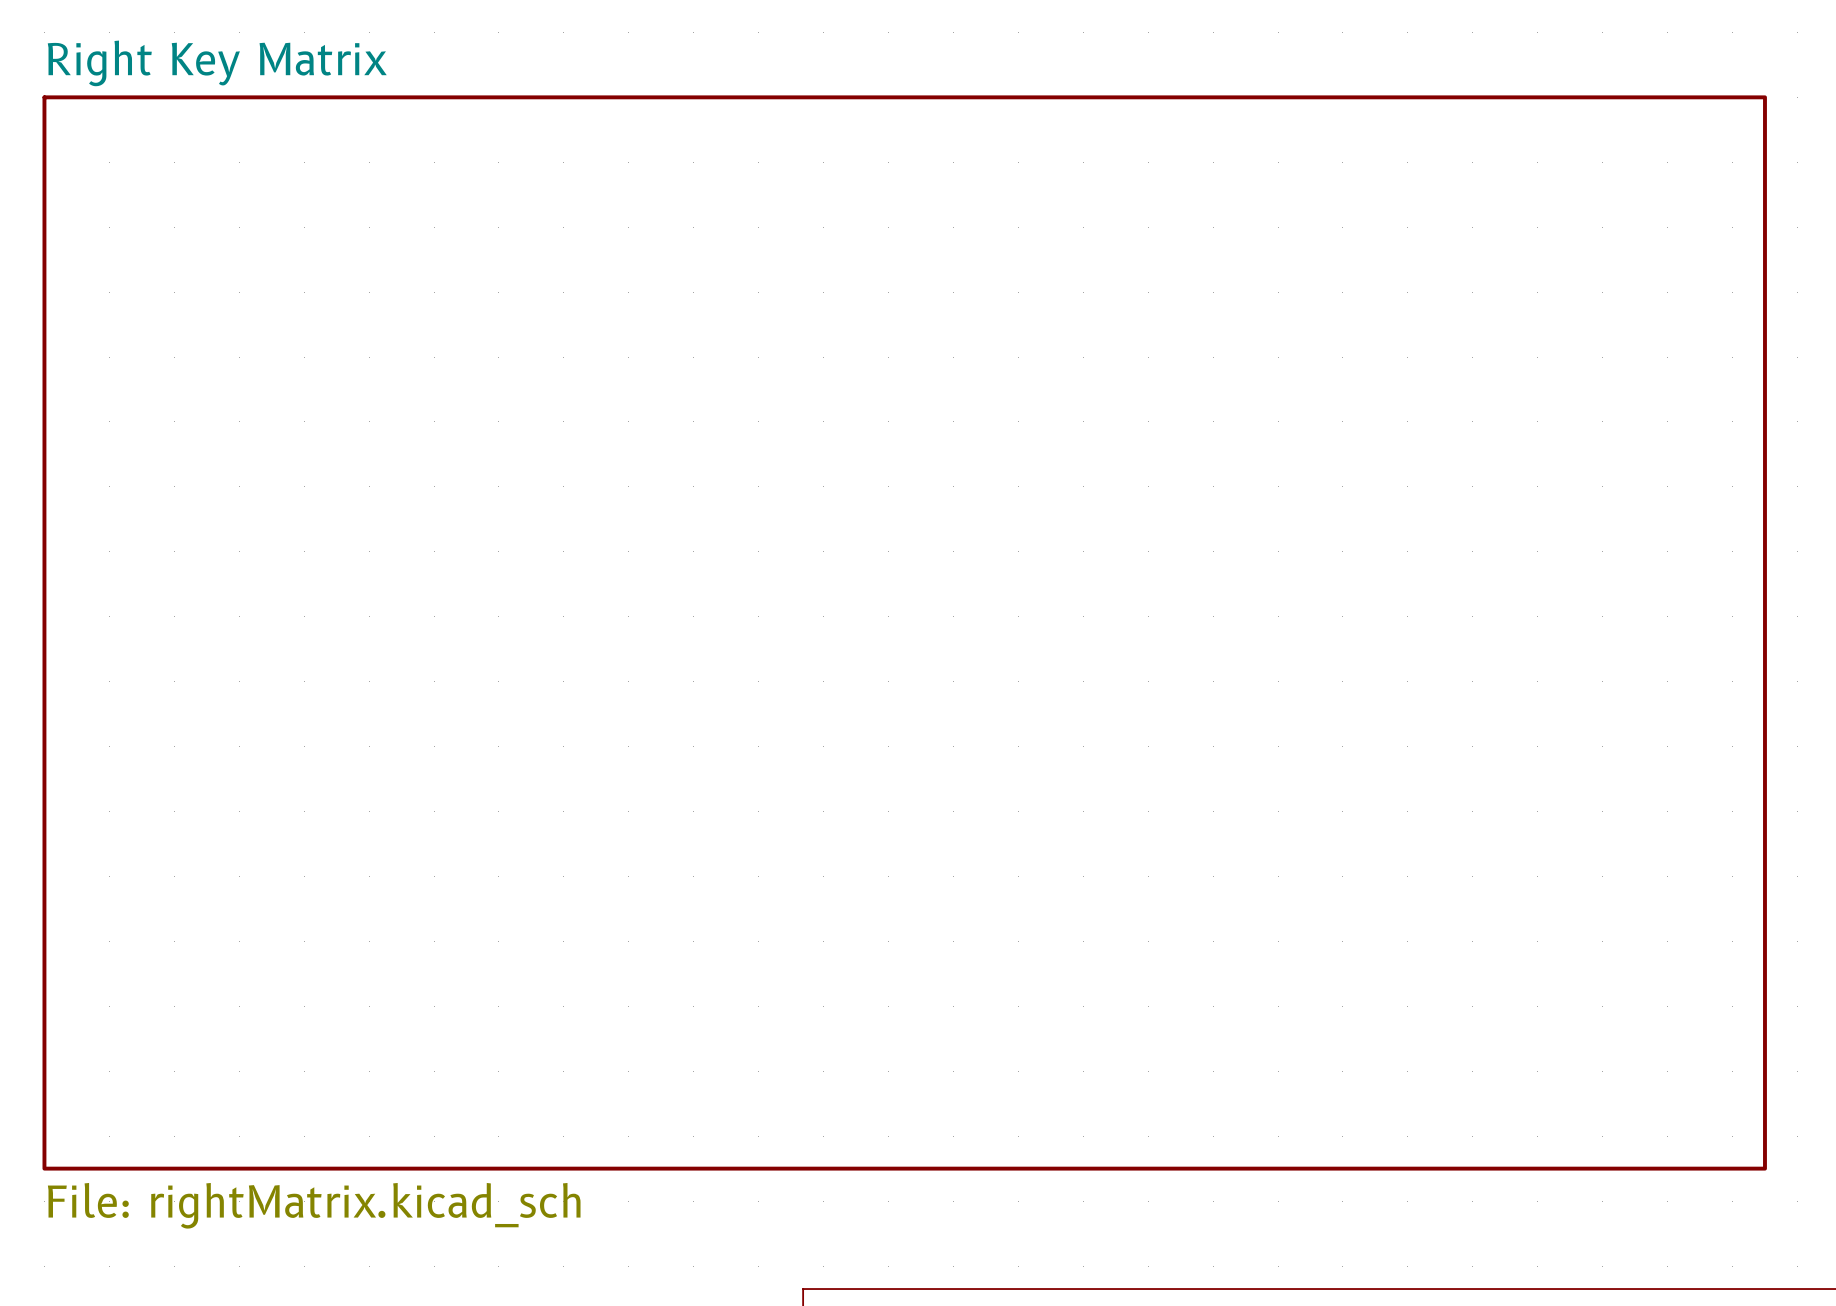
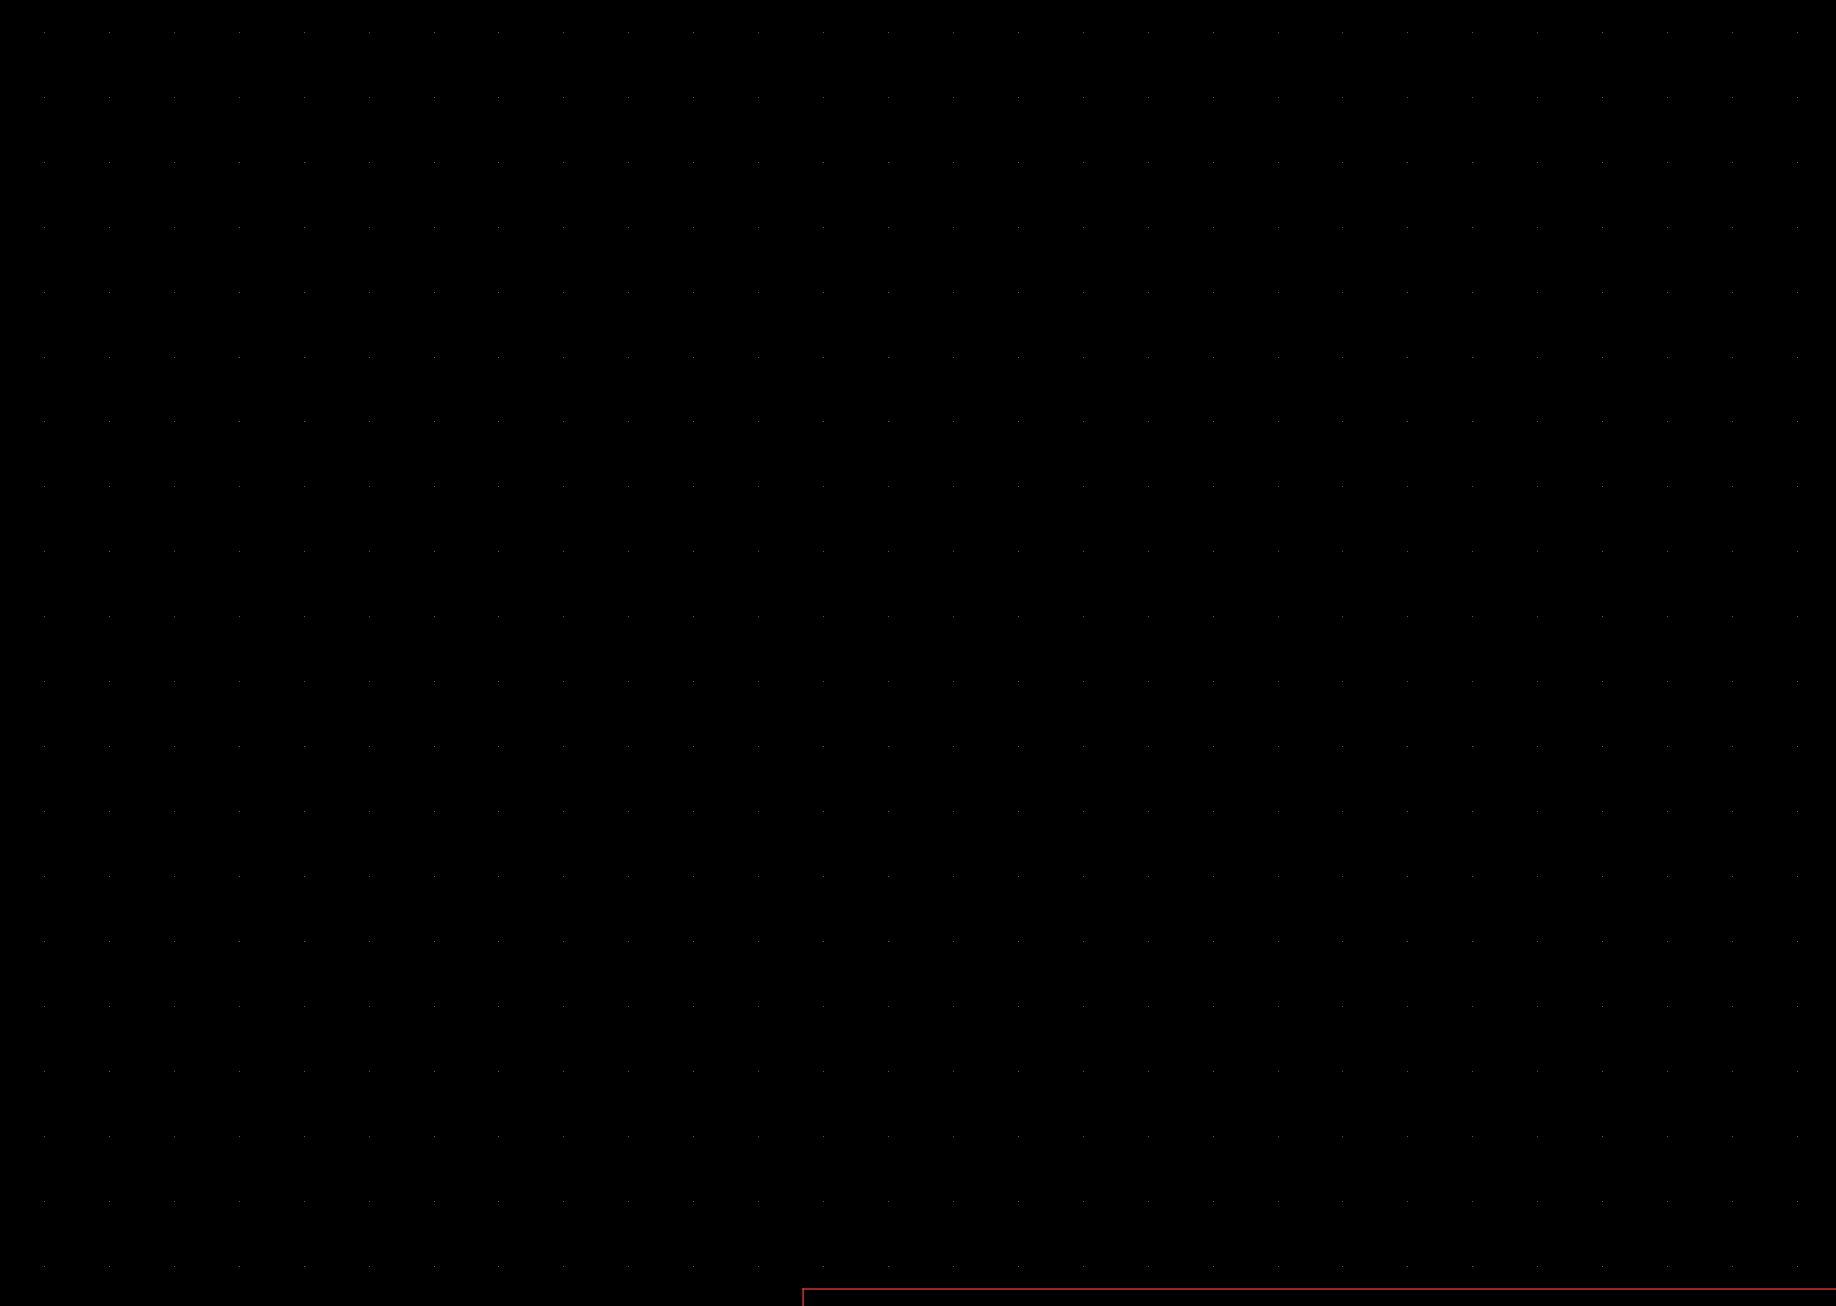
sheet Right Key Matrix: File: rightMatrix.kicad_sch (904, 632) -> none

